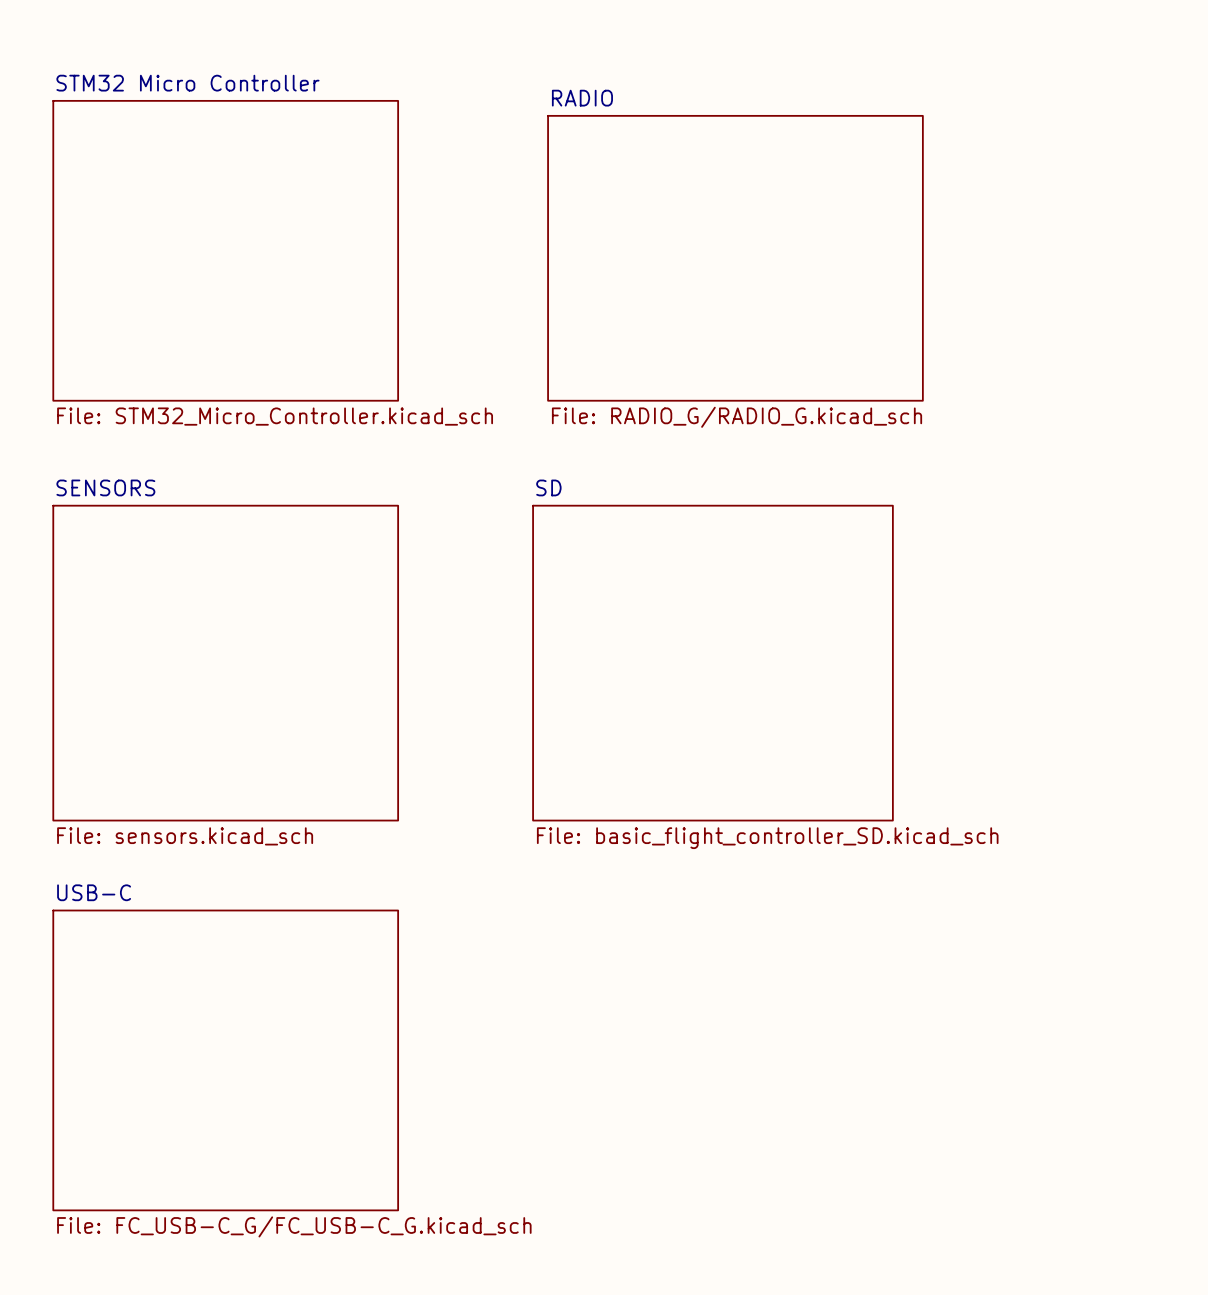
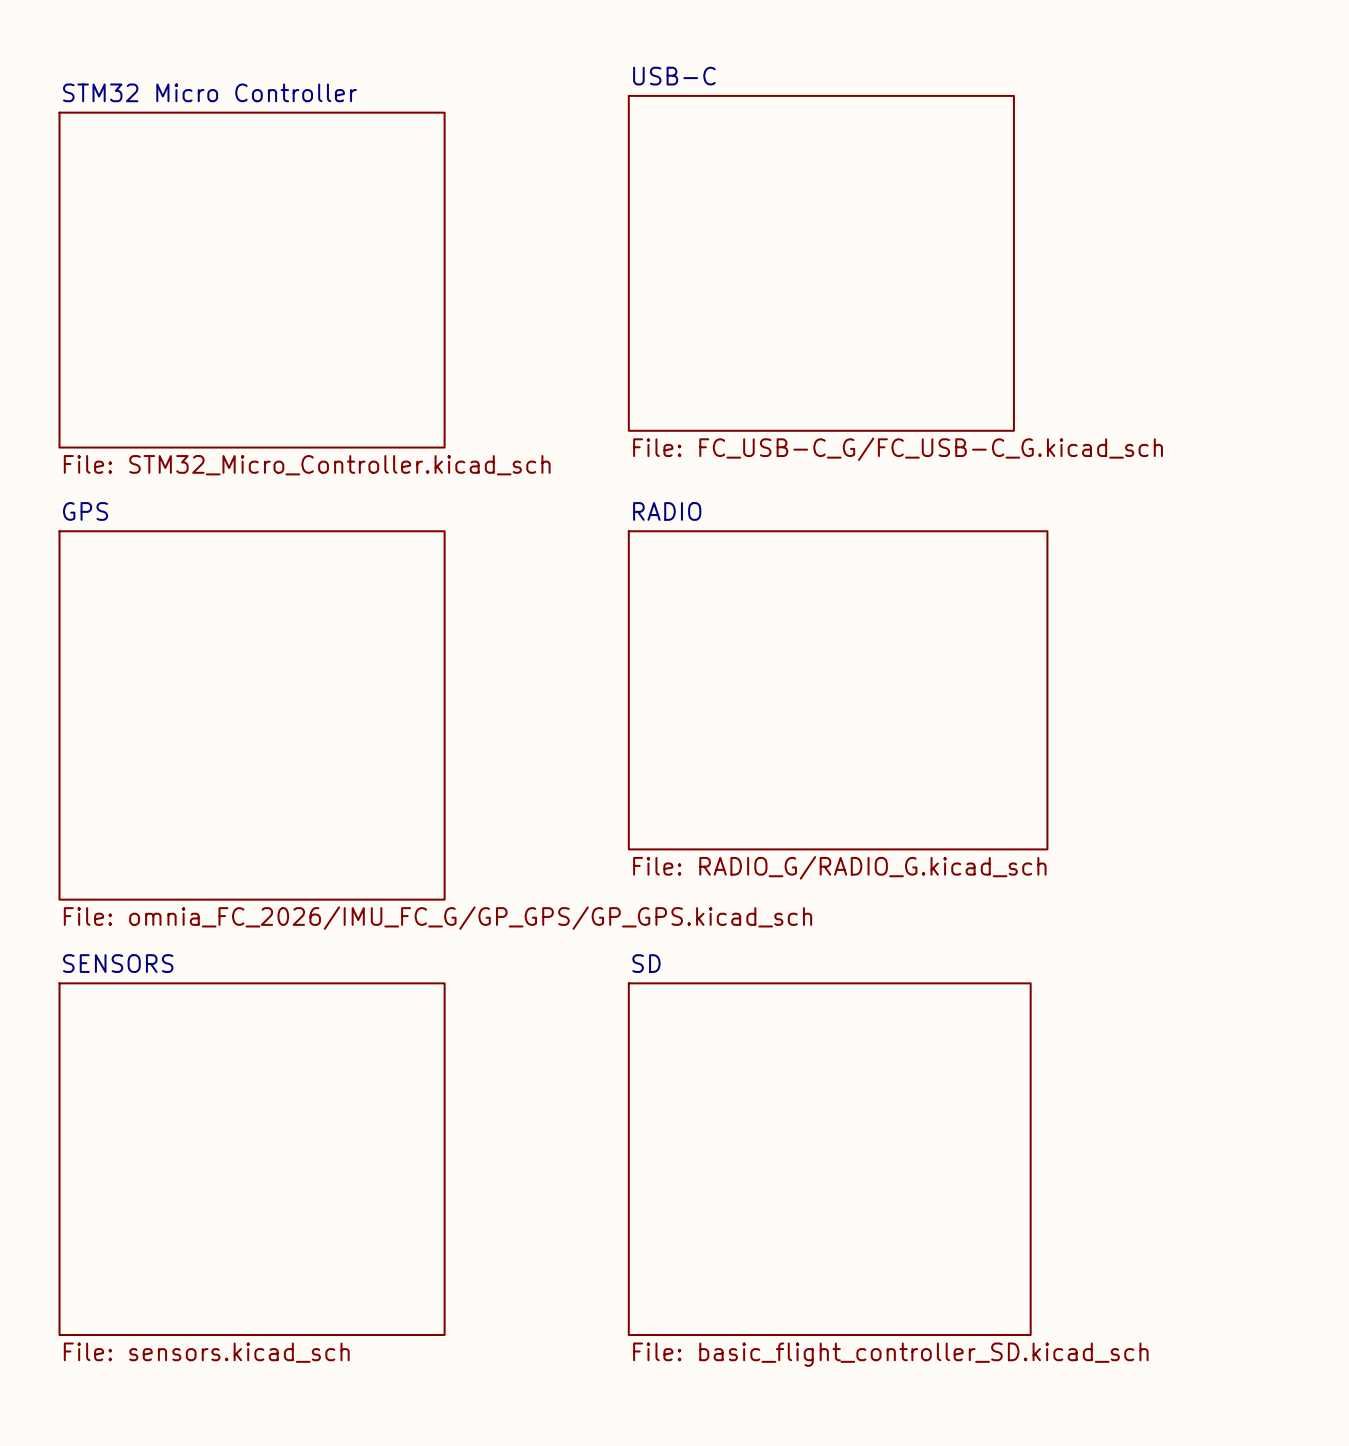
sheet USB-C: none -> File: FC_USB-C_G/FC_USB-C_G.kicad_sch (821, 263)
sheet RADIO: File: RADIO_G/RADIO_G.kicad_sch (735, 258) -> none
sheet RADIO: none -> File: RADIO_G/RADIO_G.kicad_sch (838, 690)
sheet GPS: none -> File: omnia_FC_2026/IMU_FC_G/GP_GPS/GP_GPS.kicad_sch (252, 715)
sheet SENSORS: File: sensors.kicad_sch (225, 663) -> none
sheet SD: File: basic_flight_controller_SD.kicad_sch (712, 663) -> none
sheet SENSORS: none -> File: sensors.kicad_sch (252, 1159)
sheet SD: none -> File: basic_flight_controller_SD.kicad_sch (829, 1159)
sheet USB-C: File: FC_USB-C_G/FC_USB-C_G.kicad_sch (225, 1060) -> none

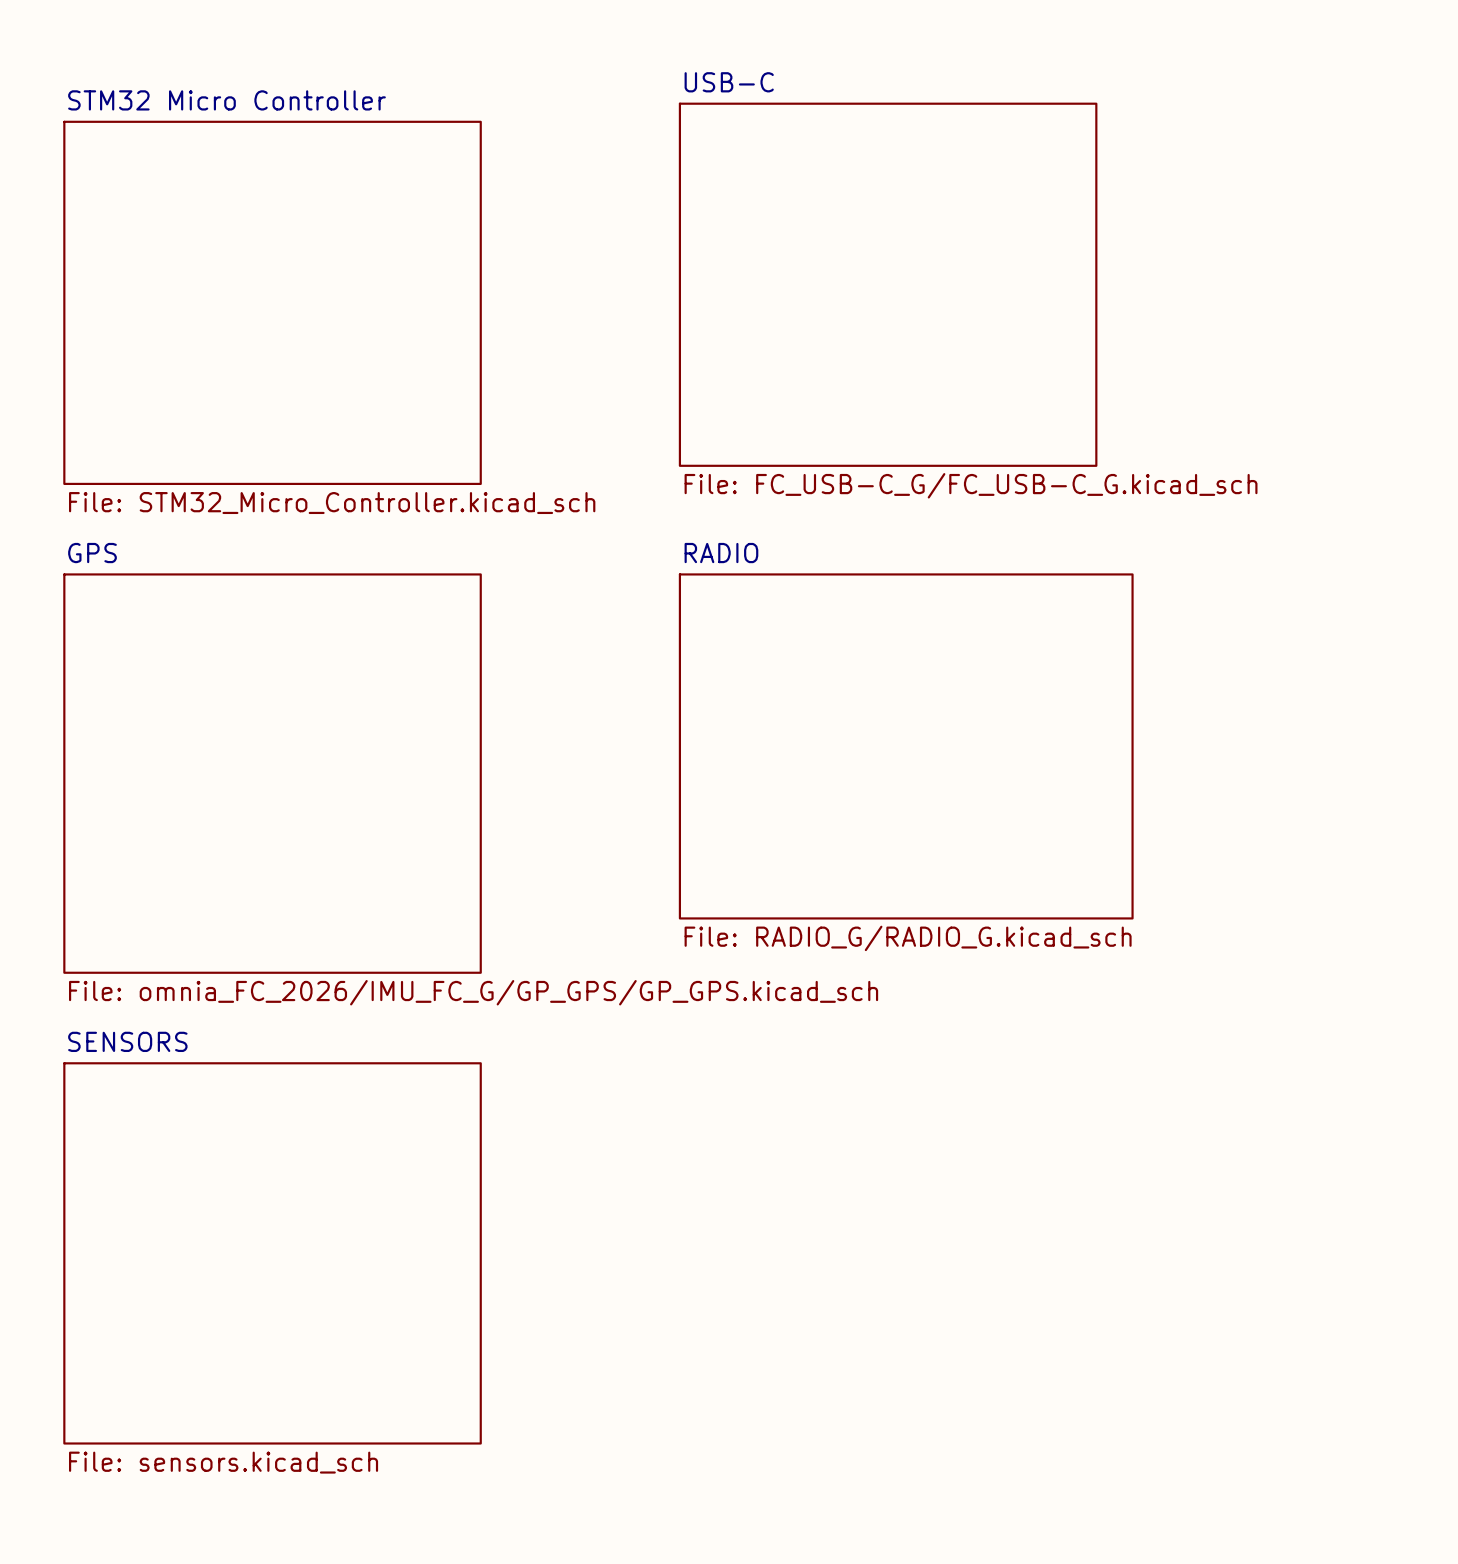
sheet SD: File: basic_flight_controller_SD.kicad_sch (829, 1159) -> none

